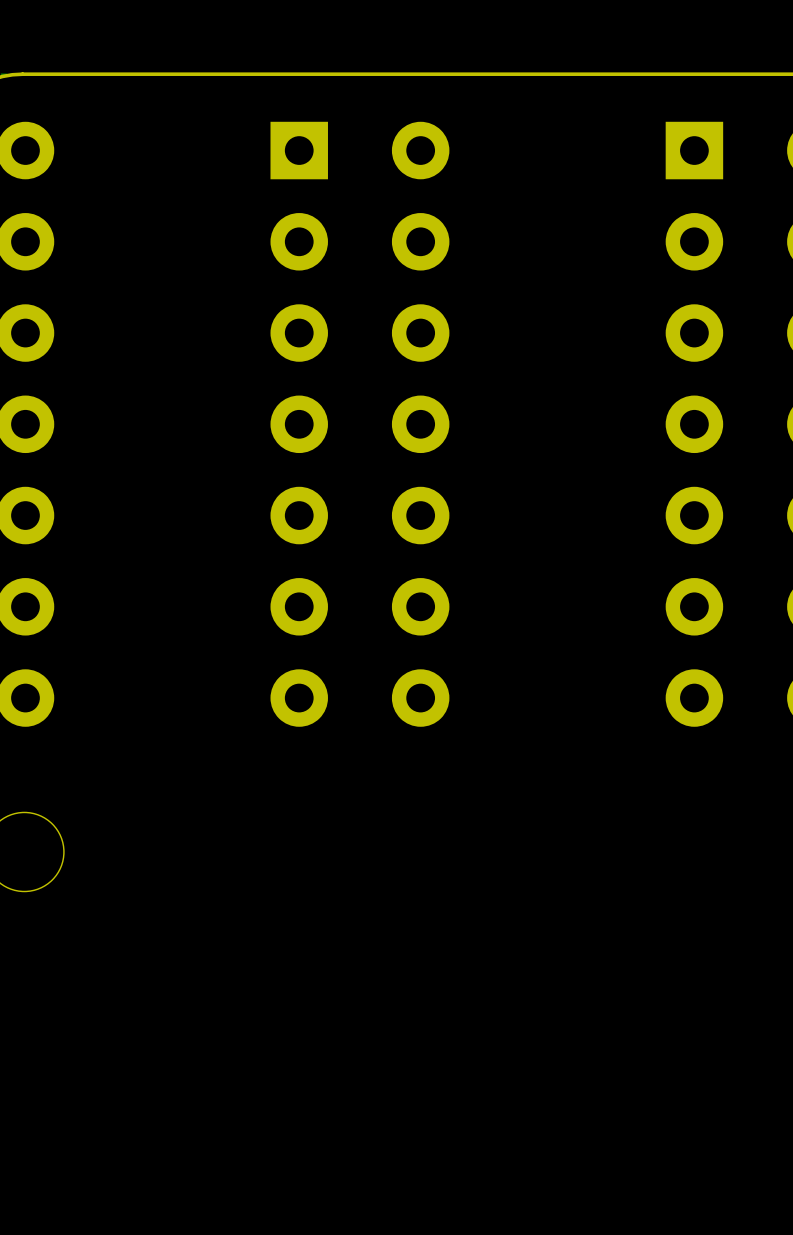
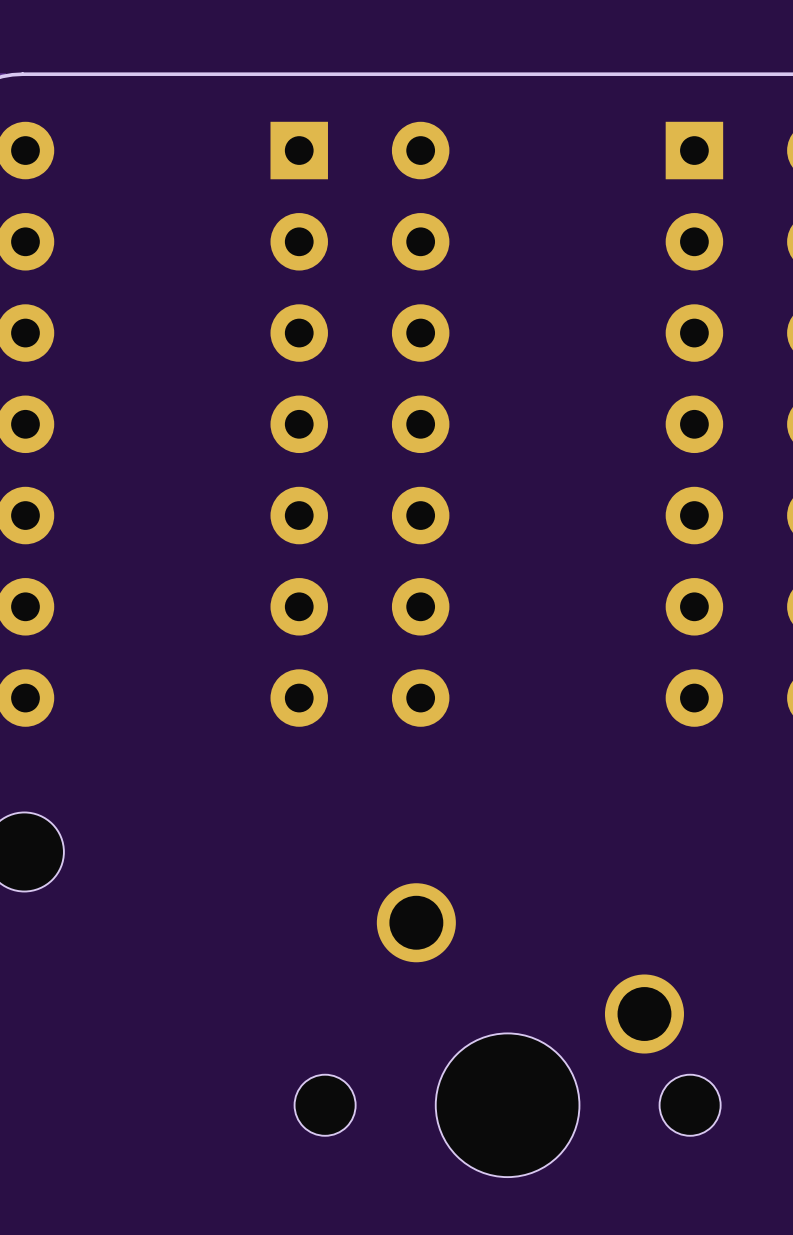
part: none -> (507, 1030)

